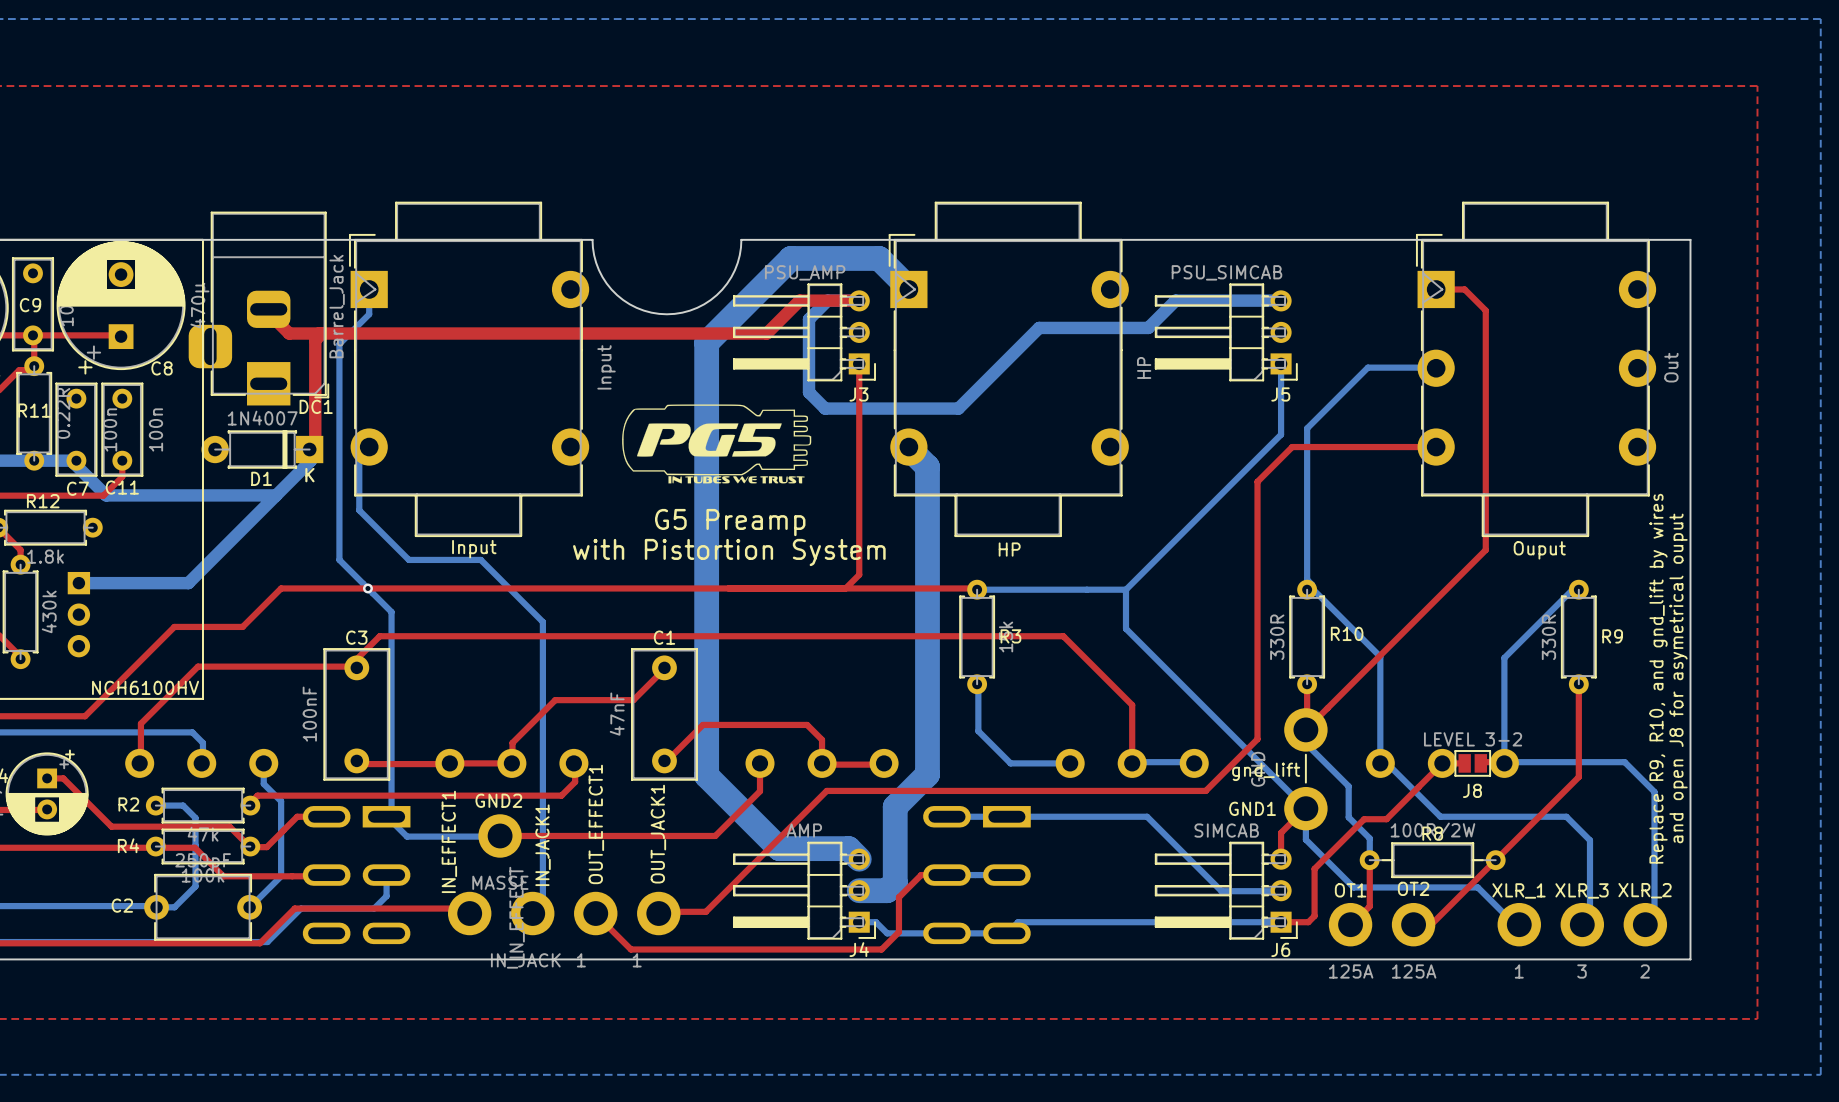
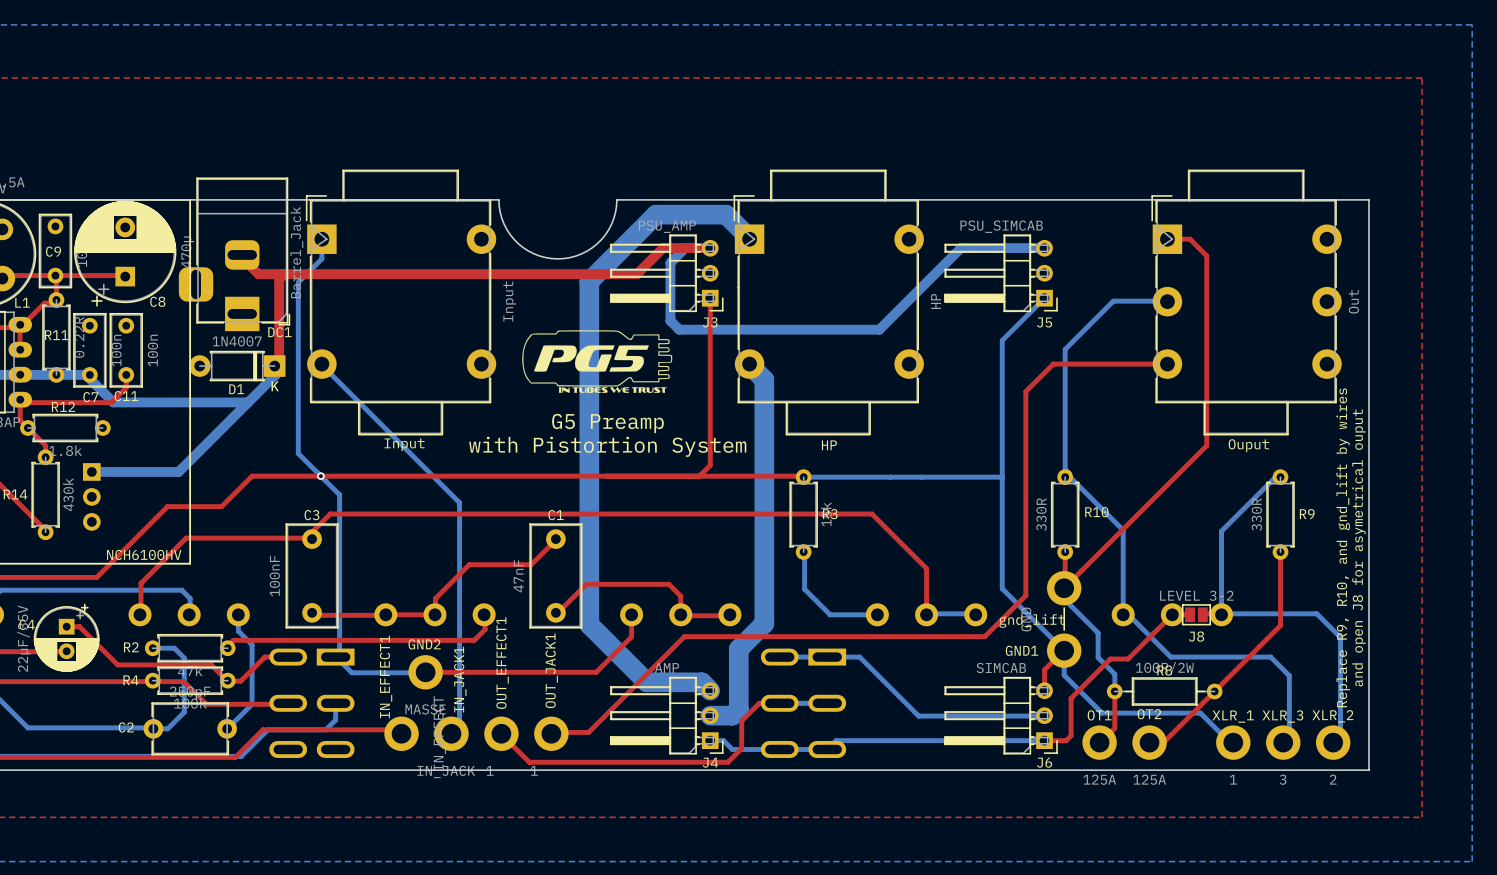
bottom track: (1148, 327) (1039, 327) (958, 408) (825, 408) (820, 403) -> (939, 269) (879, 329) (679, 329)
bottom track: (1281, 363) (1281, 434) (1126, 589) (1126, 628) (1227, 730) -> (1044, 298) (1002, 340) (1002, 588)
bottom track: (369, 447) (359, 456) (359, 510) (408, 559) (480, 559) -> (321, 364) (410, 453)
bottom track: none -> (921, 477) (1002, 477)
bottom track: (1047, 816) (1147, 816) (1221, 891) -> (859, 657) (918, 716) (997, 716)

